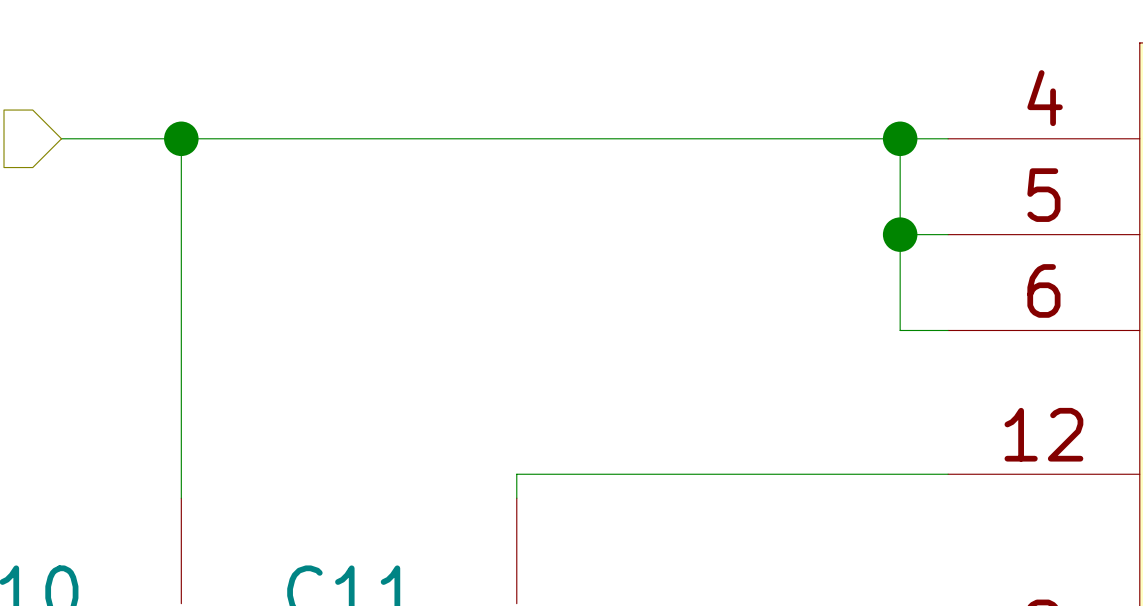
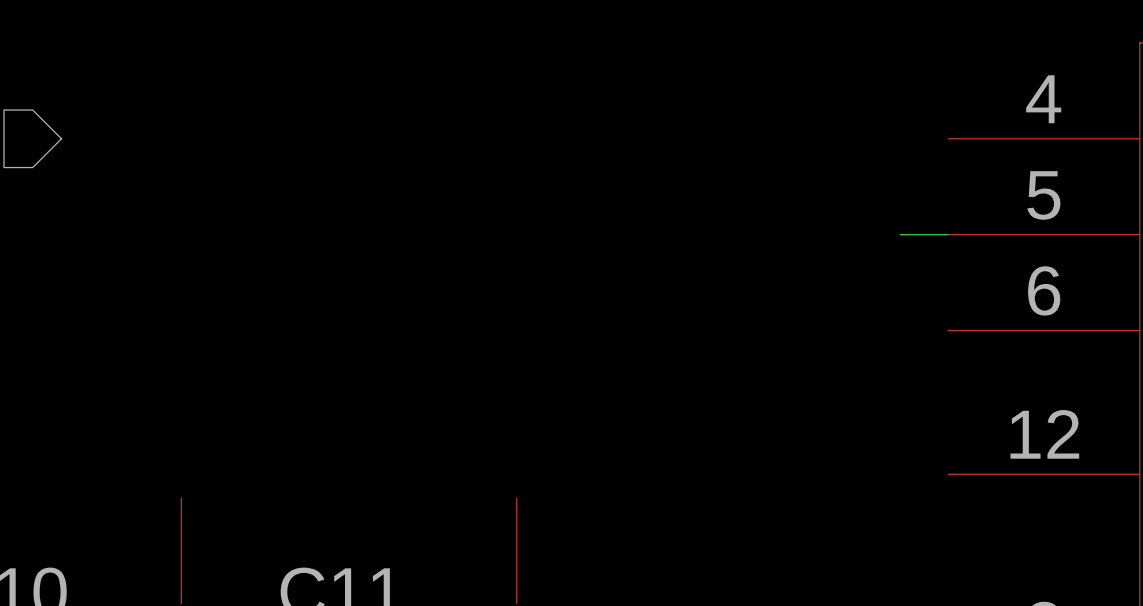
wire: (61, 138) (948, 138) -> none
wire: (181, 138) (181, 498) -> none
junction: (181, 138) -> none
wire: (900, 138) (900, 330) (948, 330) -> none
junction: (900, 138) -> none
junction: (900, 234) -> none
wire: (948, 474) (516, 474) (516, 498) -> none

